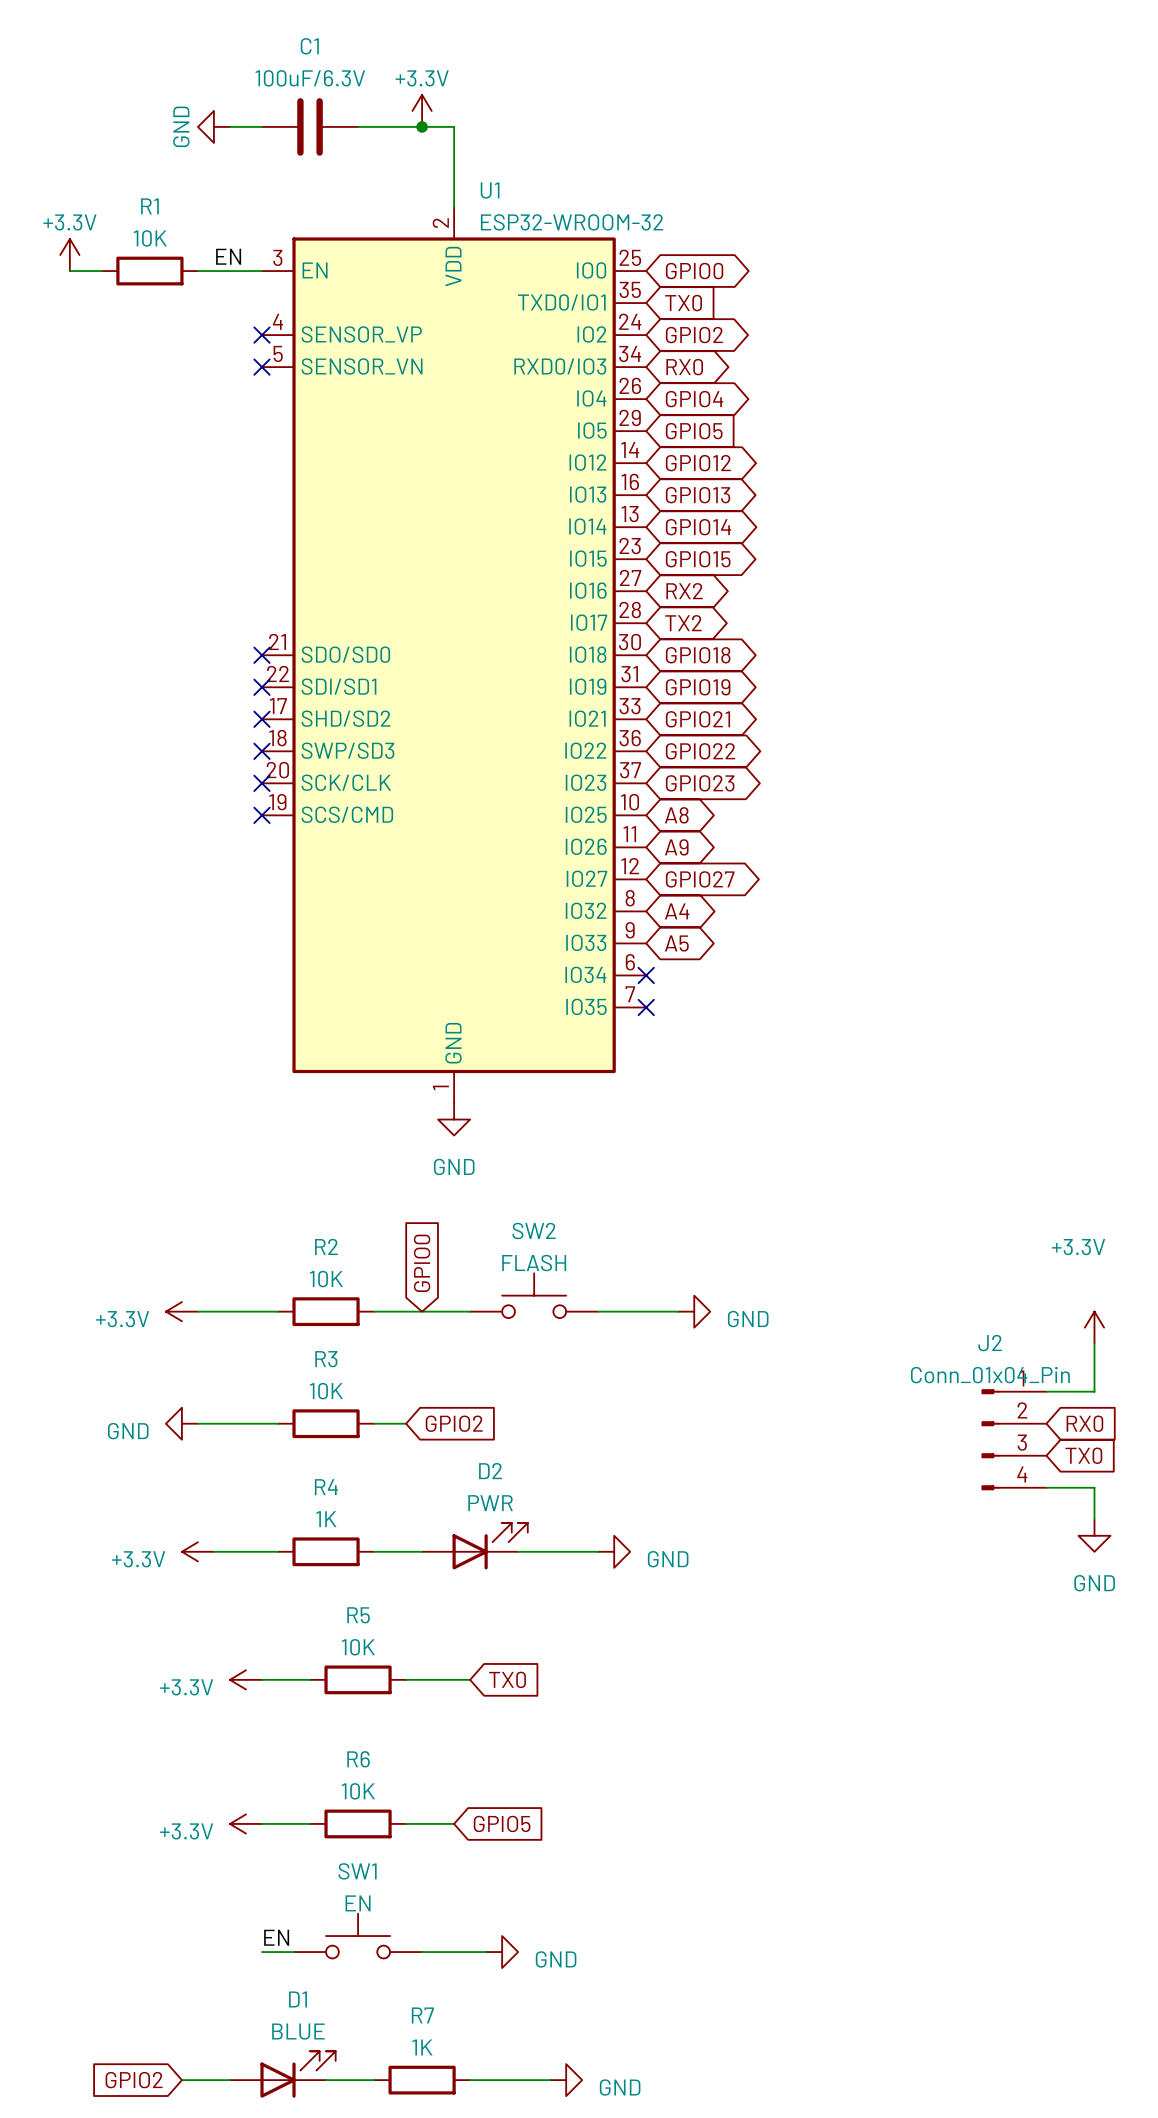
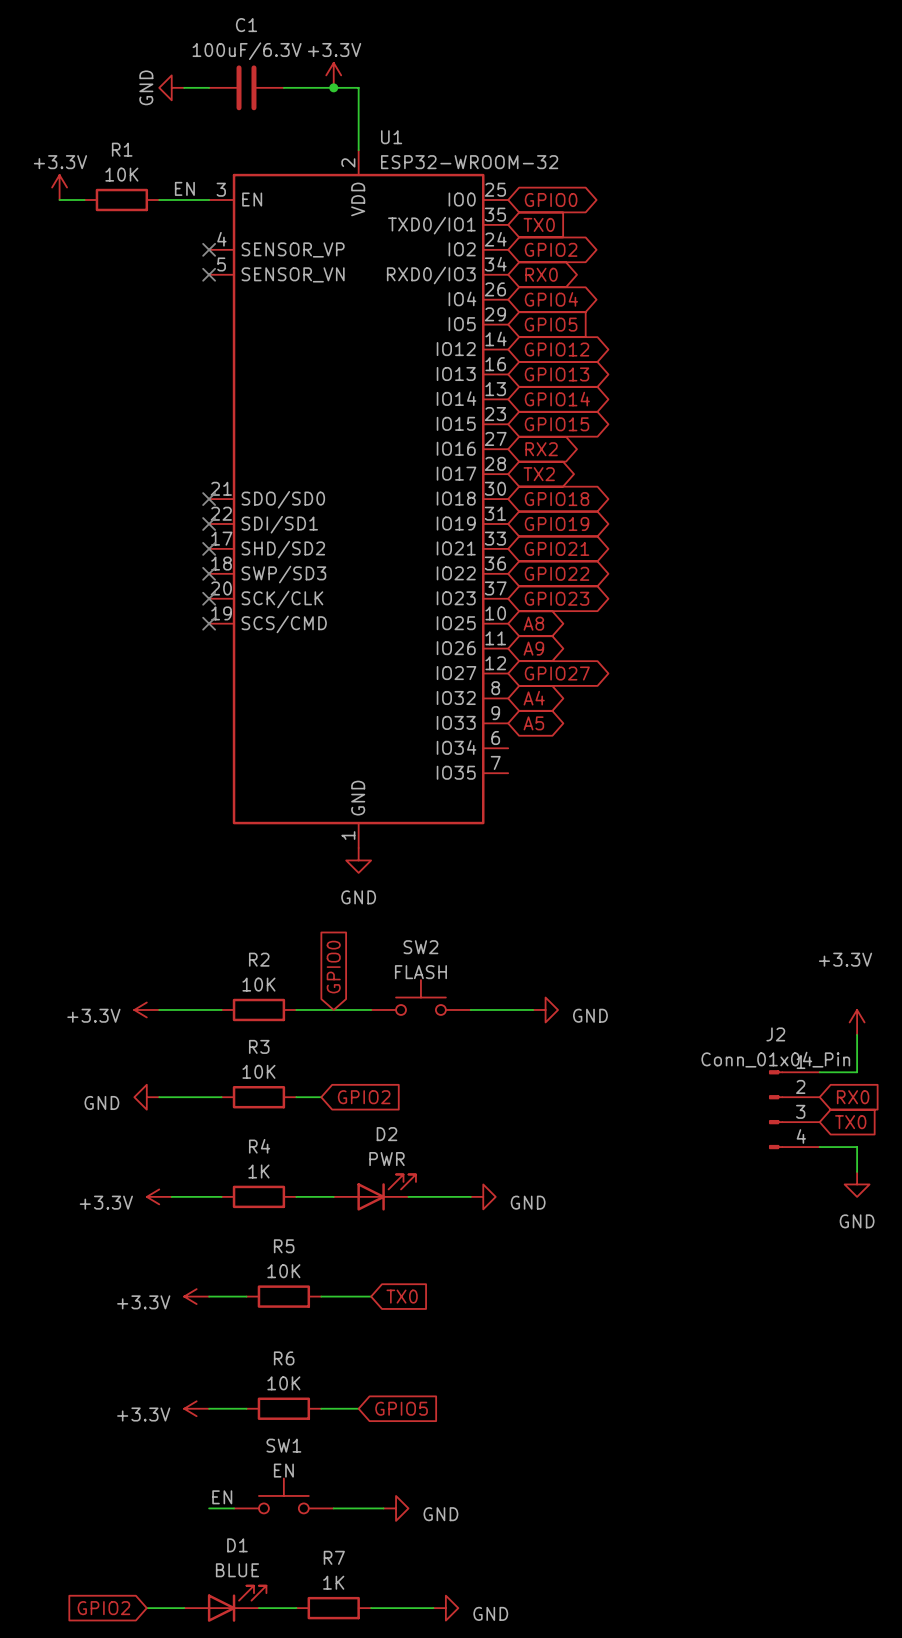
no-connect mark: (646, 975) -> none
no-connect mark: (646, 1007) -> none

